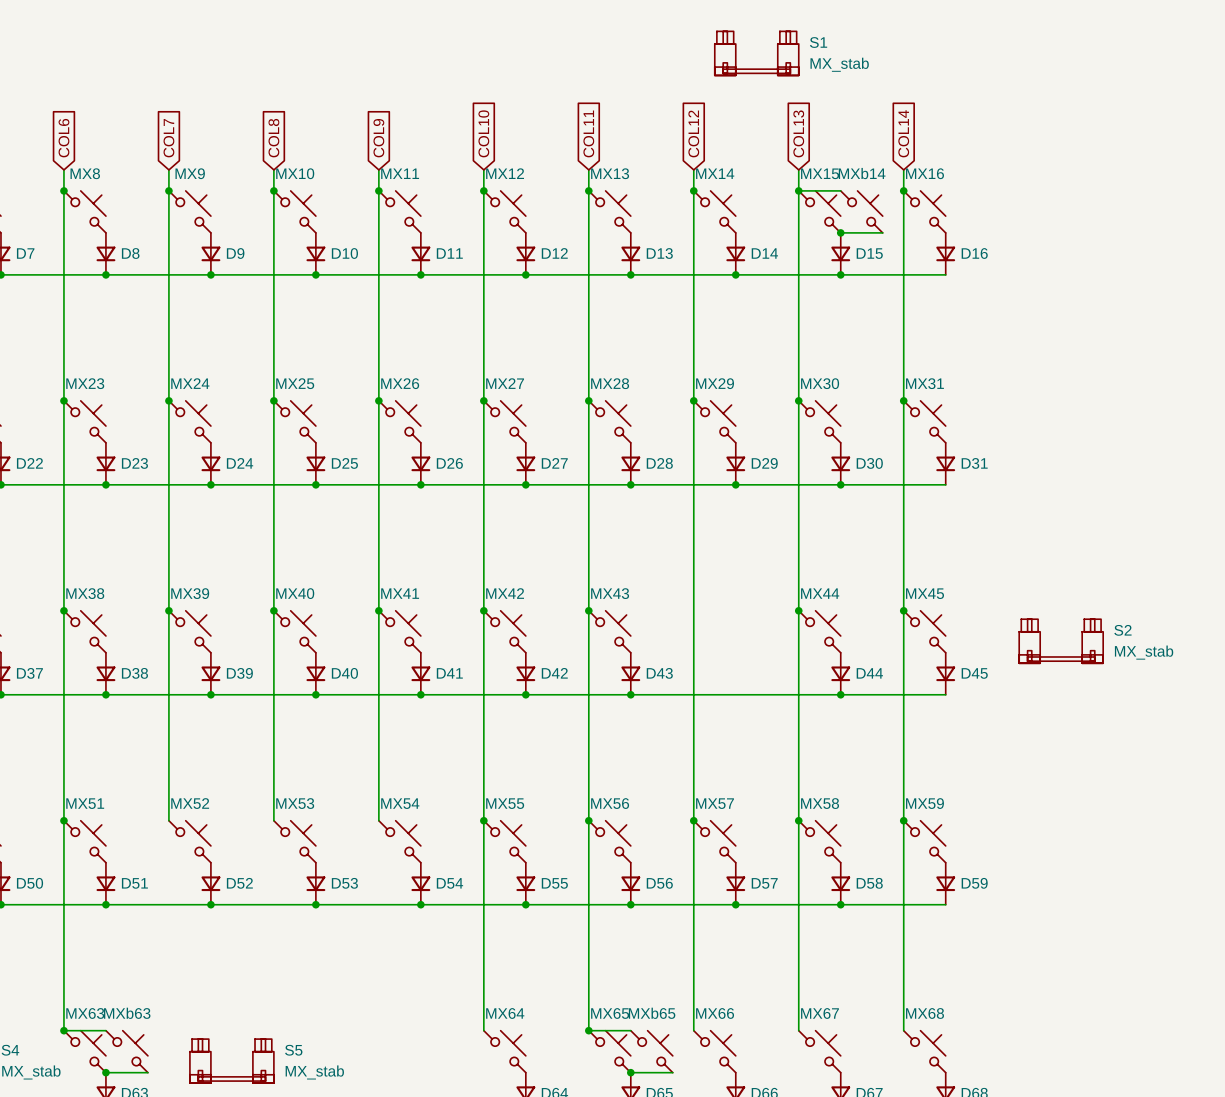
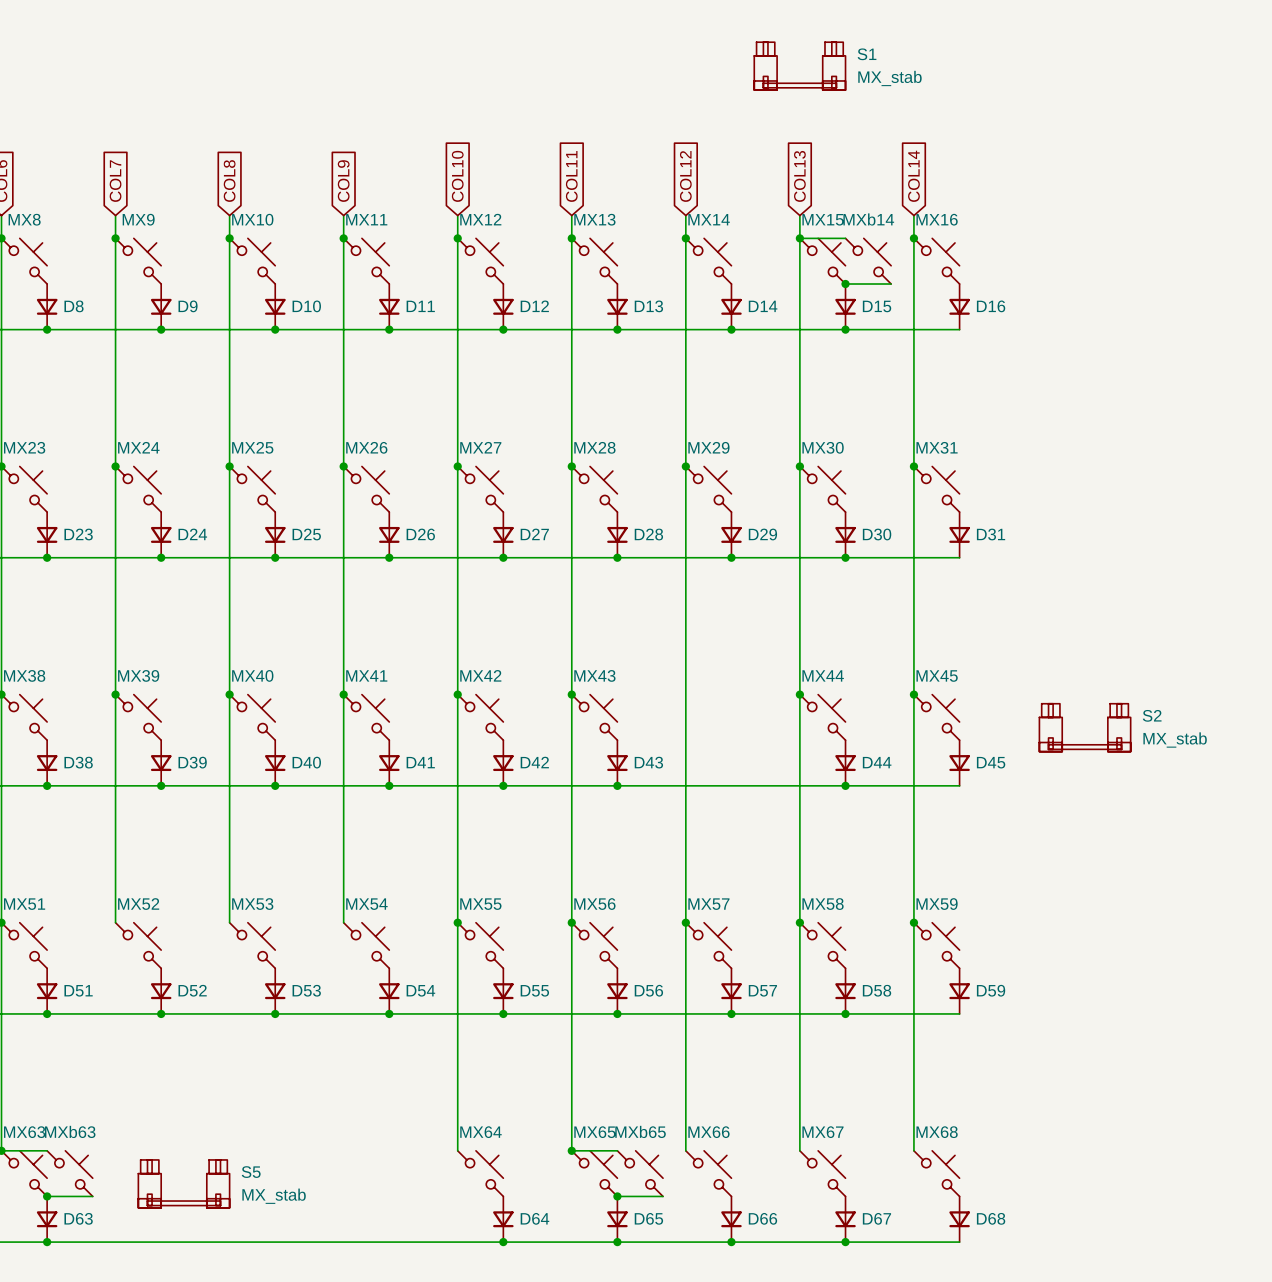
S1 position: (756, 53) -> (799, 66)

